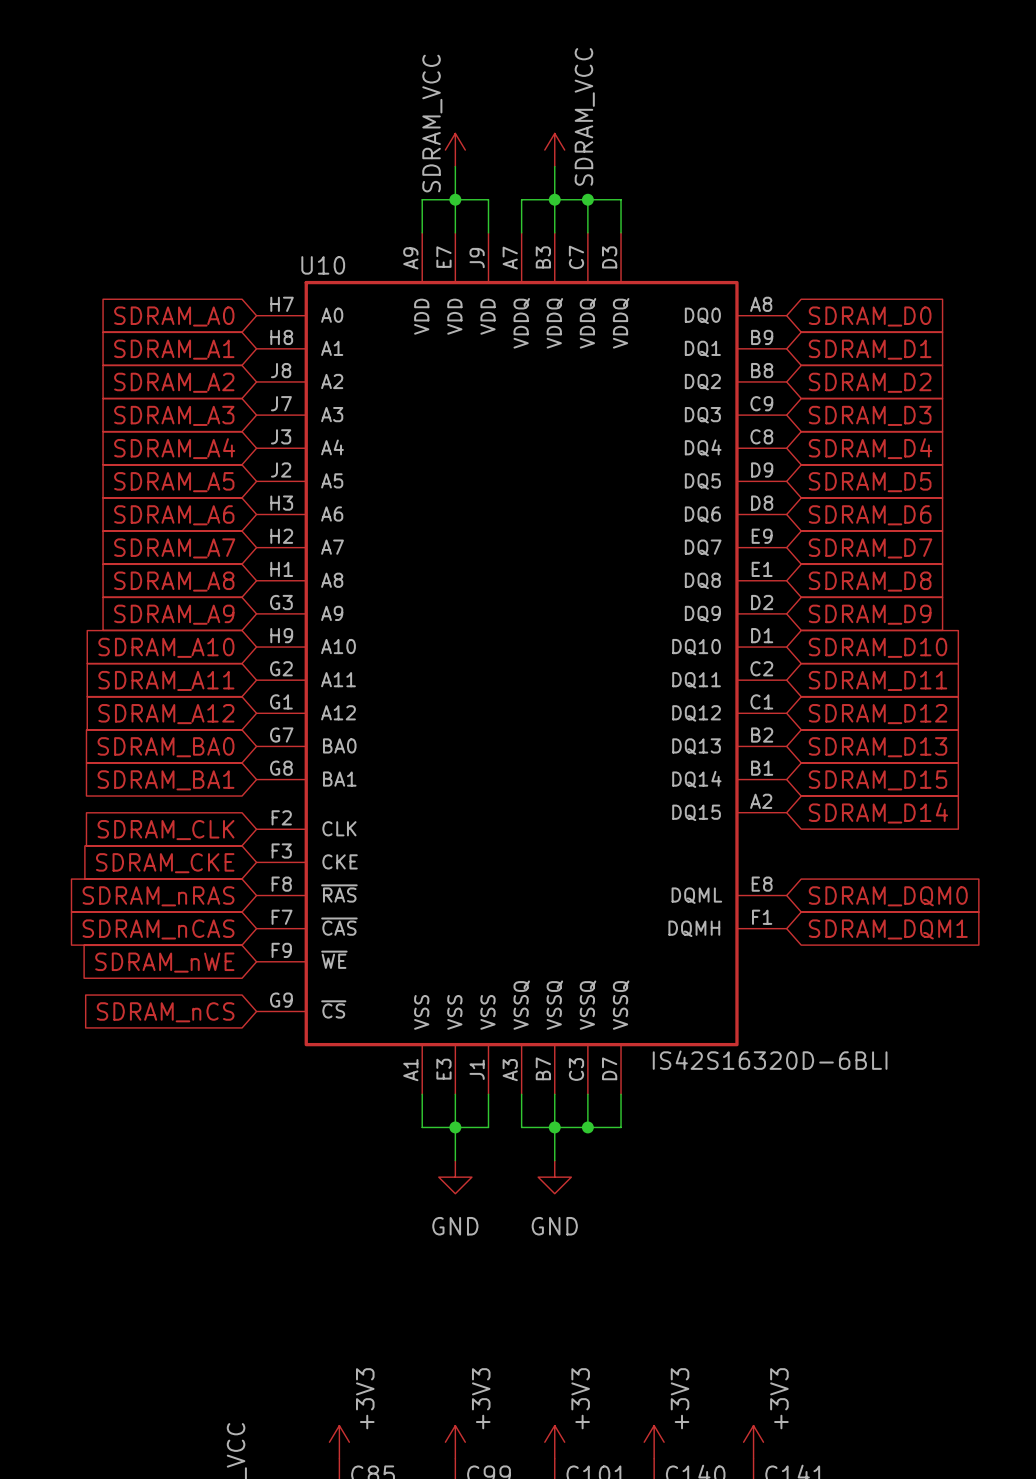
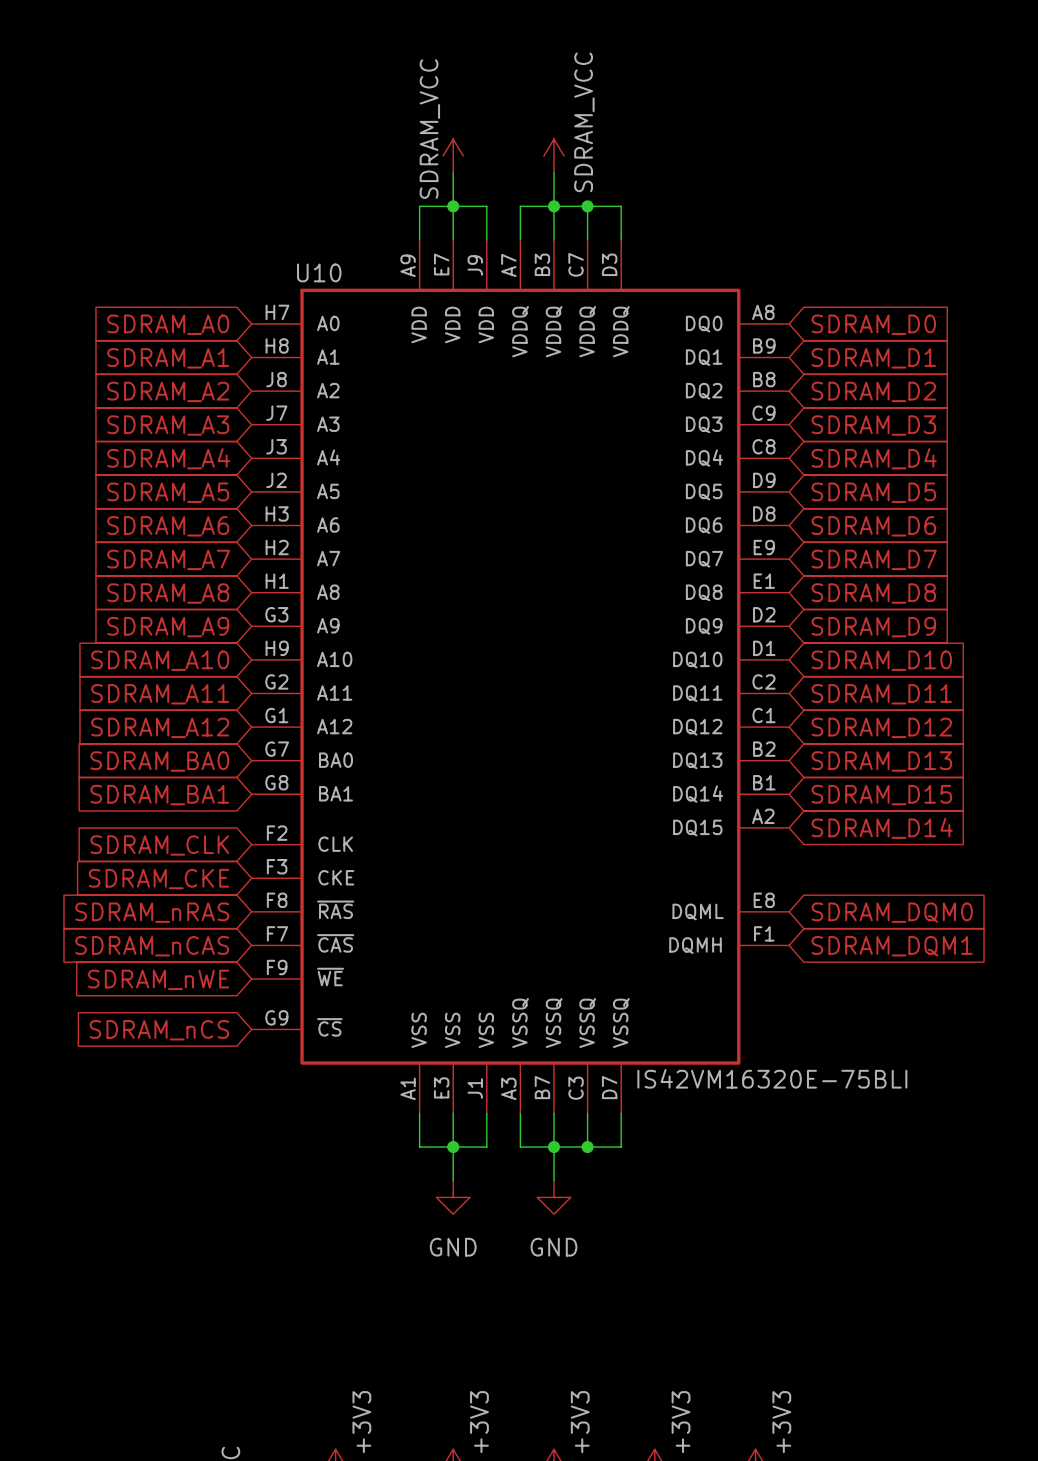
U10 value: IS42S16320D-6BLI (770, 1060) -> IS42VM16320E-75BLI (772, 1078)

